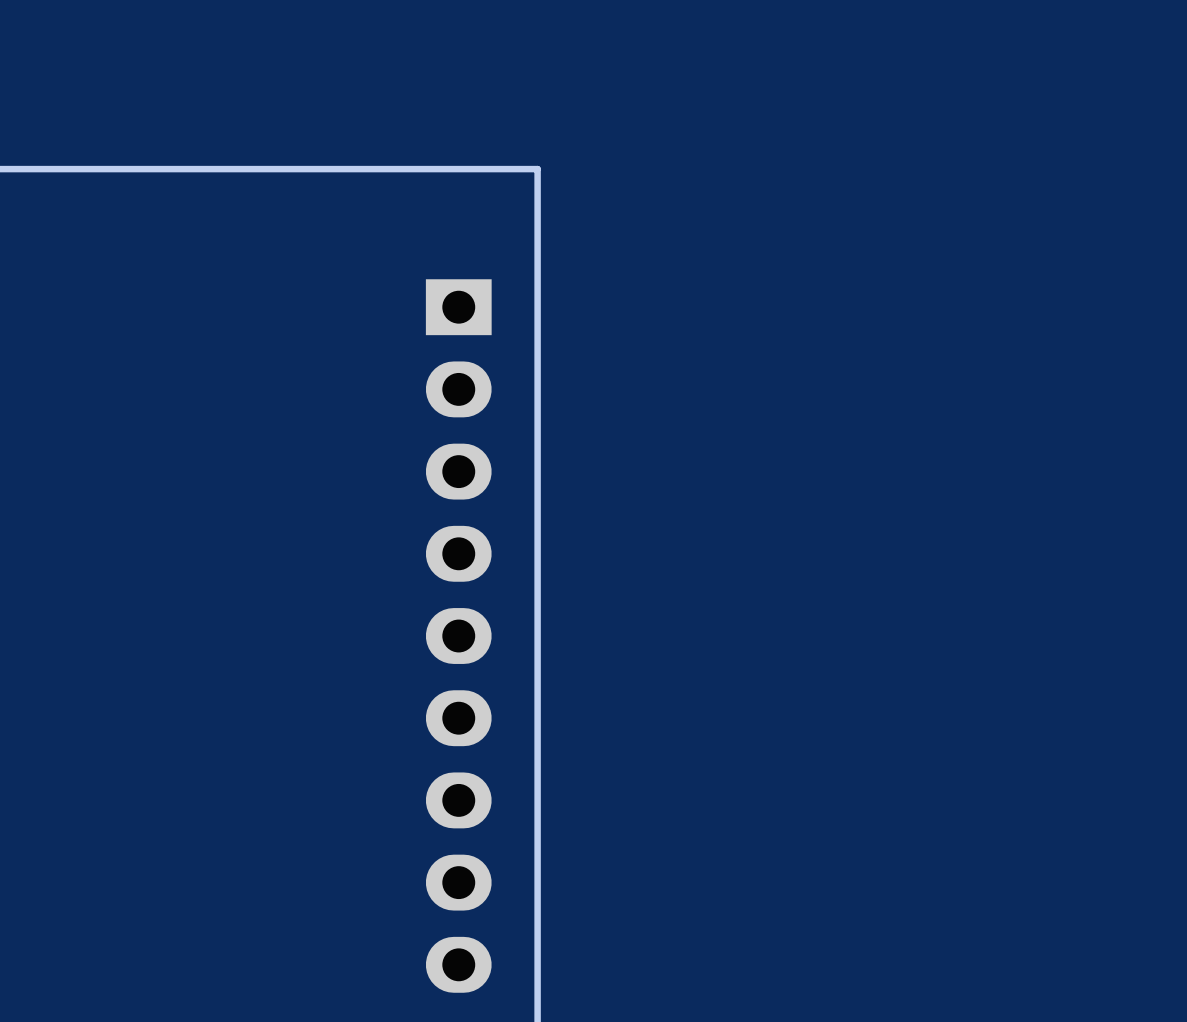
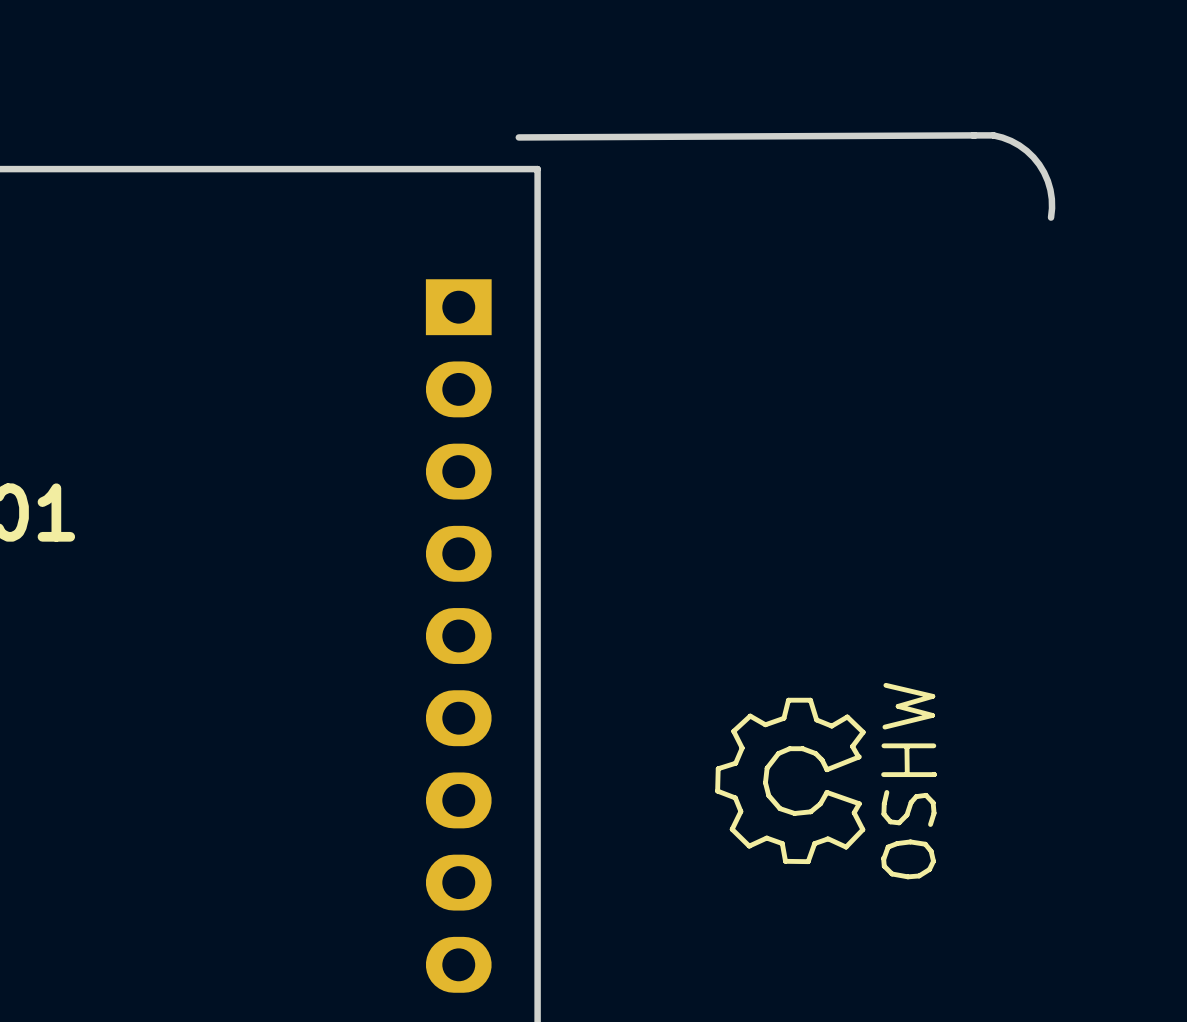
board edge: none -> (972, 135) (993, 135) (1002, 137) (1019, 145) (1033, 157) (1044, 172) (1050, 189) (1051, 217)
board edge: none -> (975, 135) (518, 137)
drawing: none -> [715, 682, 937, 880]

